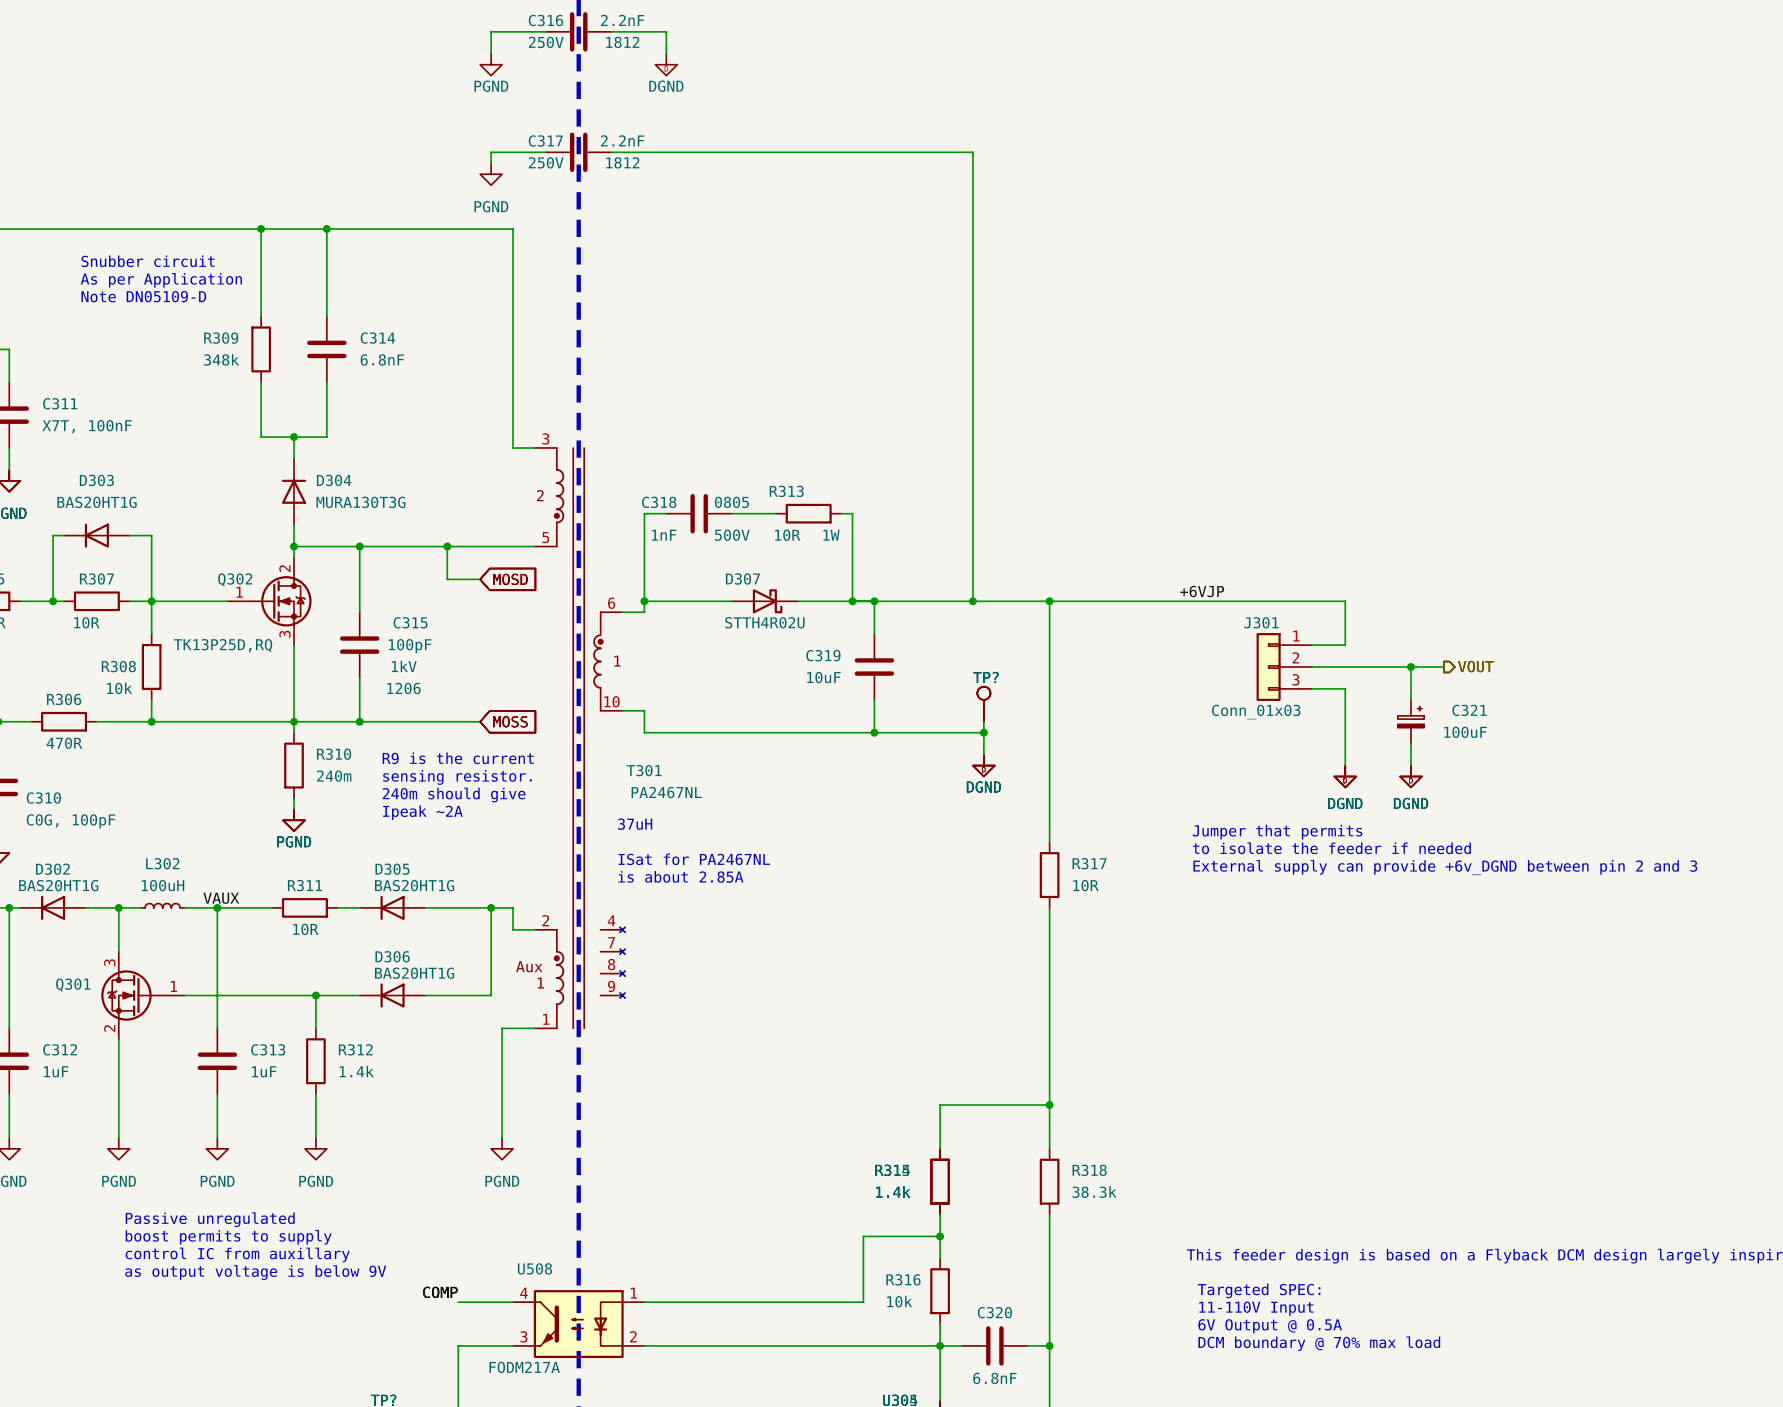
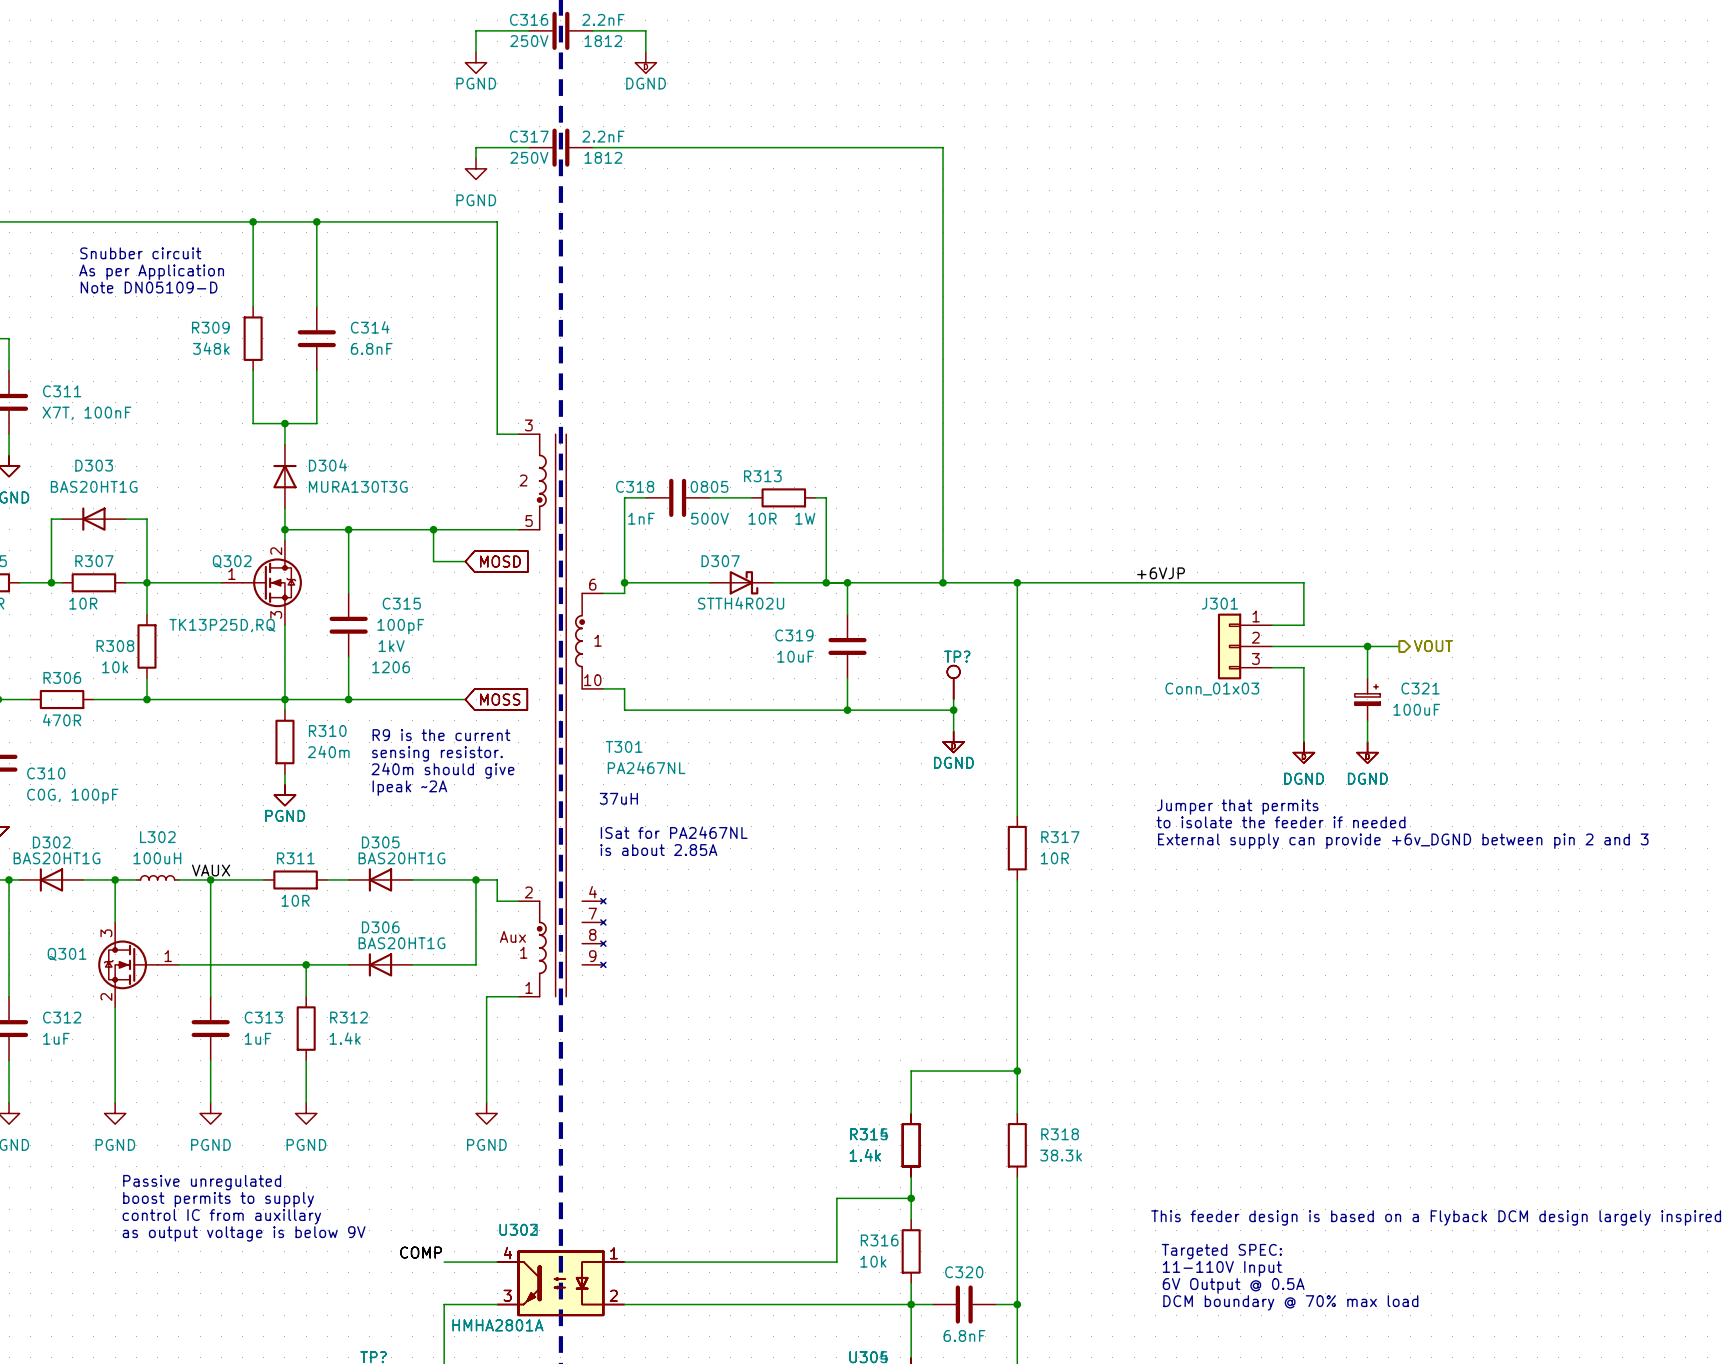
U508: (578, 1324) -> none
part: none -> HMHA2801A (560, 1283)
part: none -> HMHA2801A (560, 1283)

